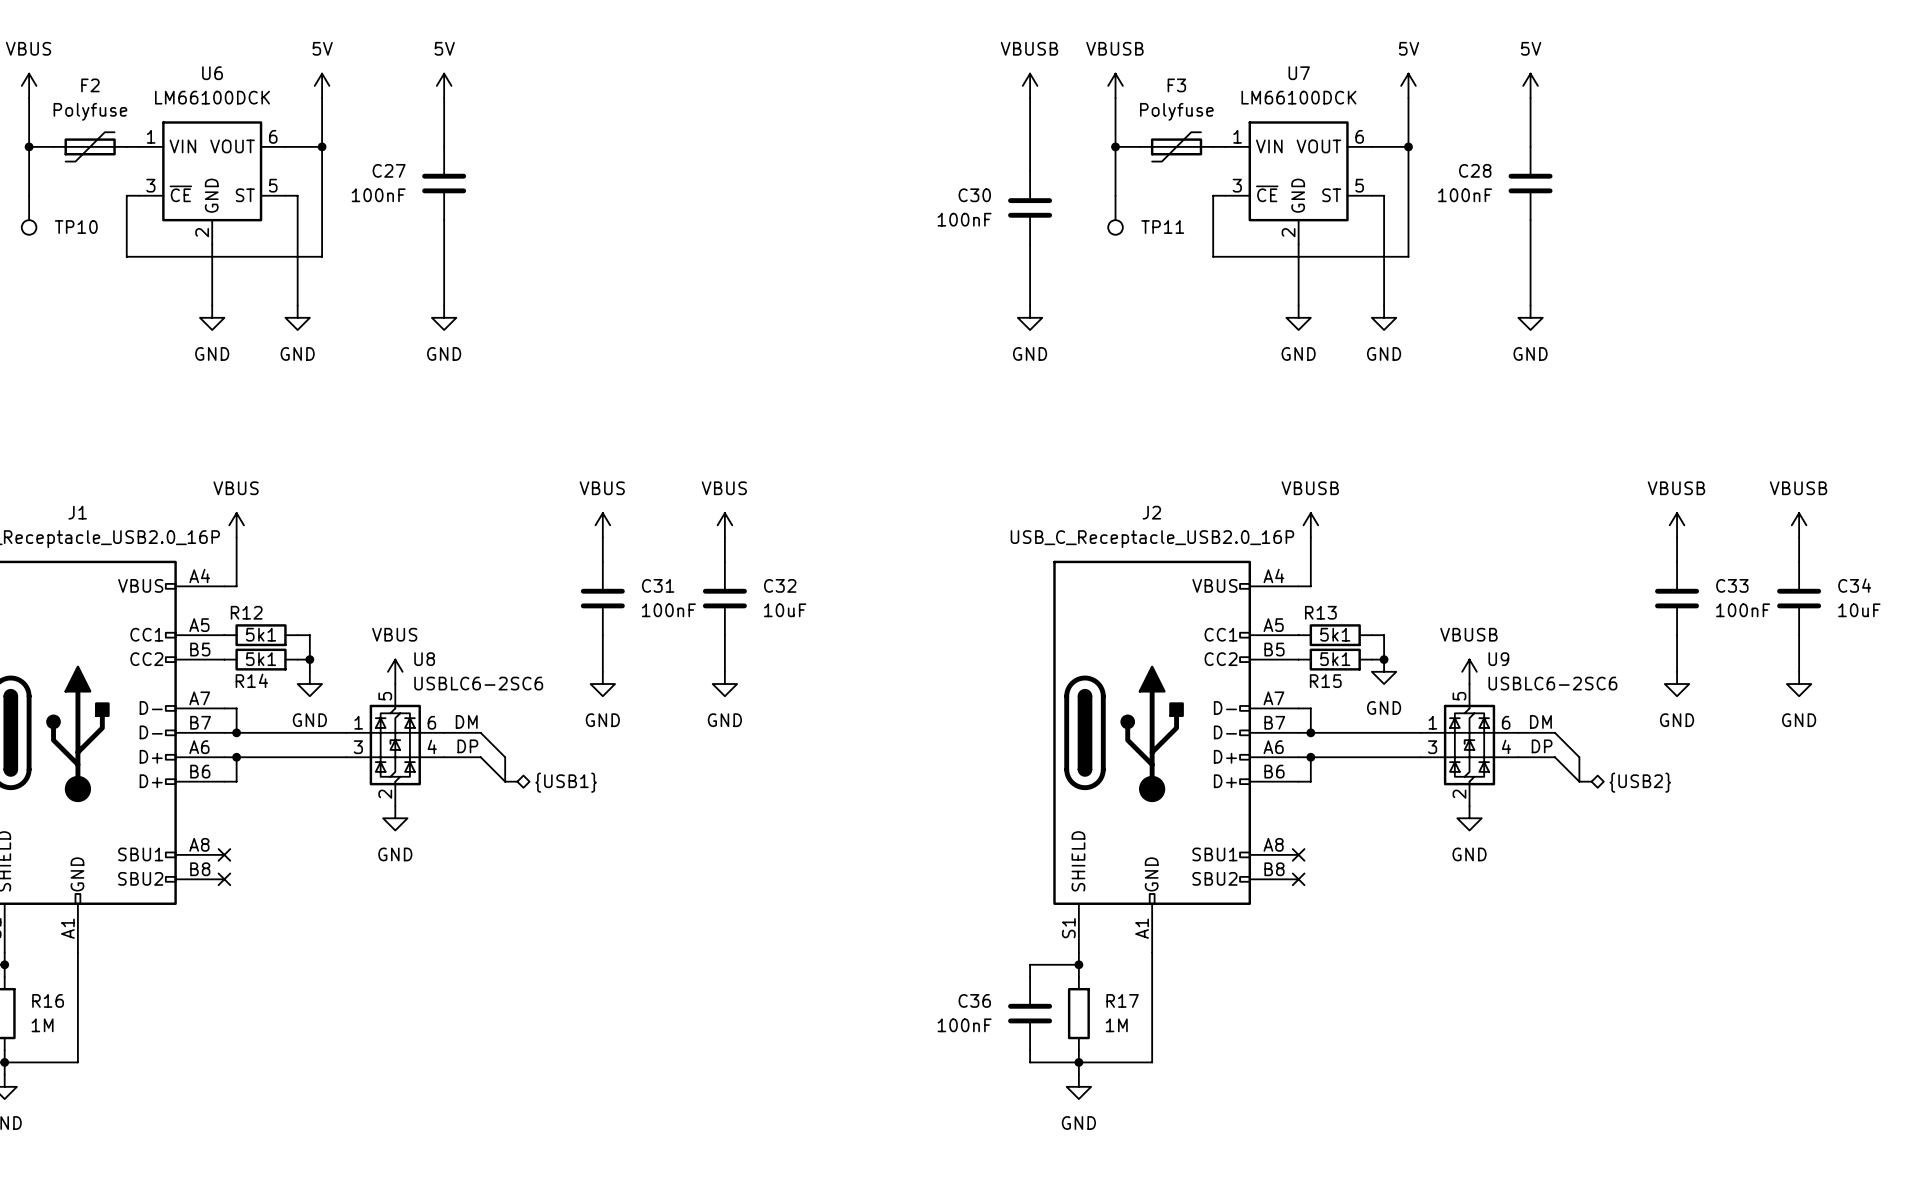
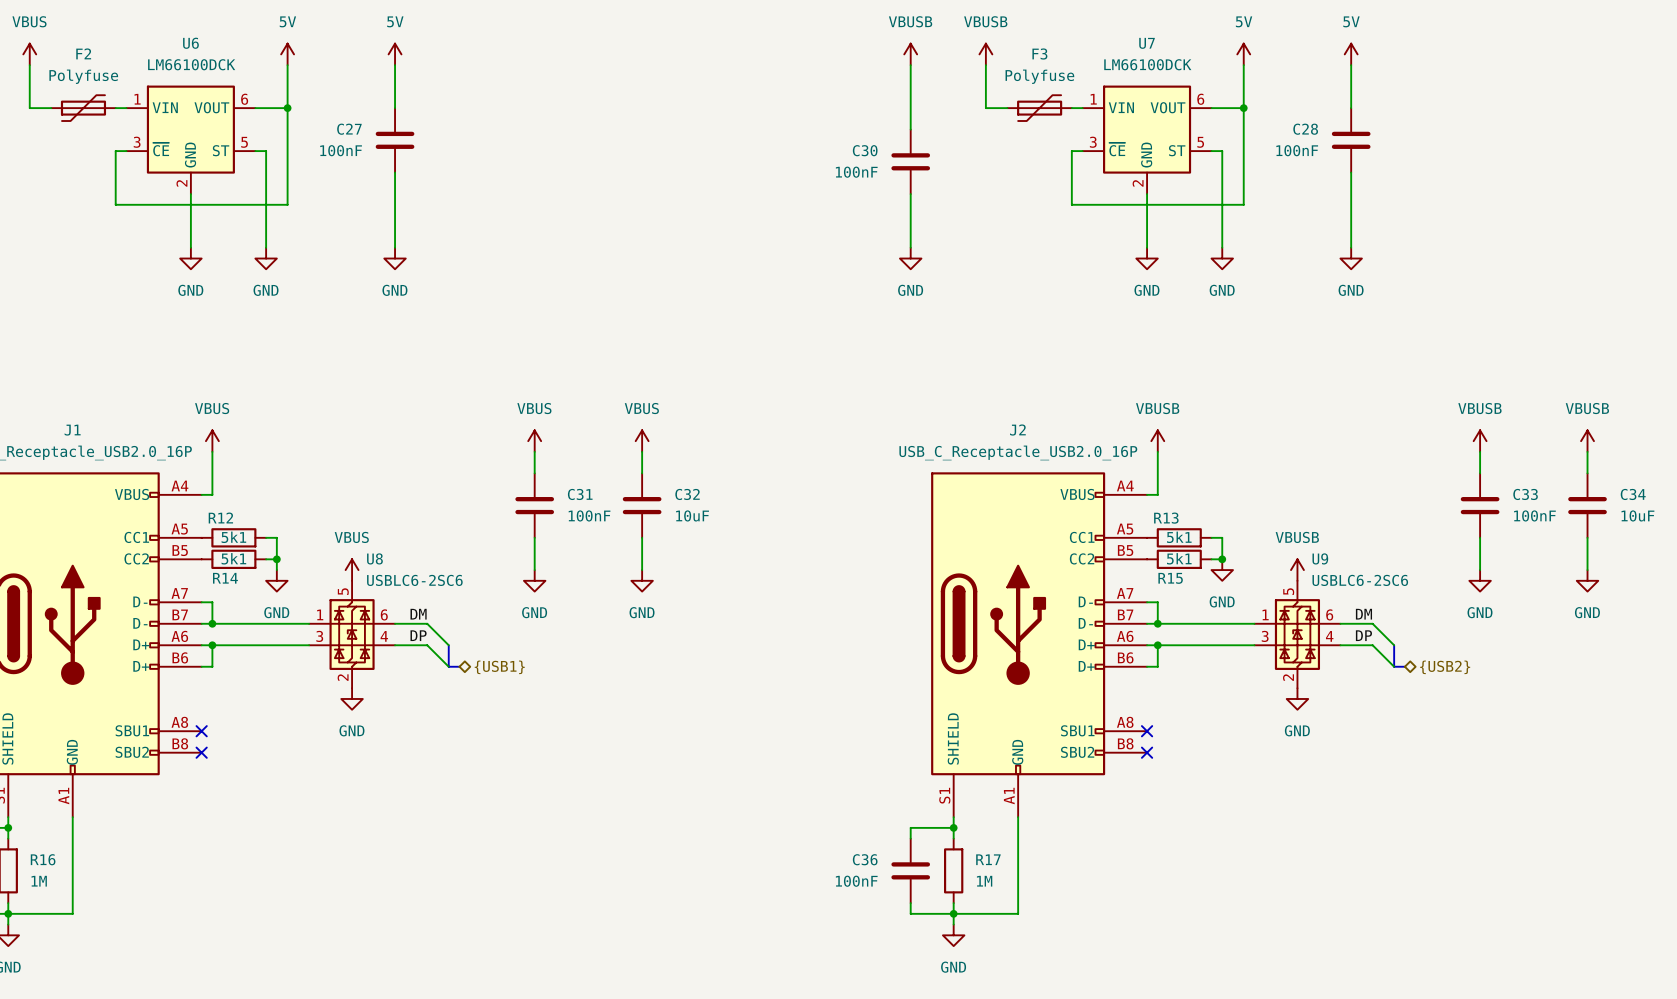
wire: (29, 146) (29, 195) -> none
junction: (29, 146) -> none
wire: (1115, 146) (1115, 195) -> none
junction: (1115, 146) -> none
TP10: (29, 215) -> none
TP11: (1115, 215) -> none

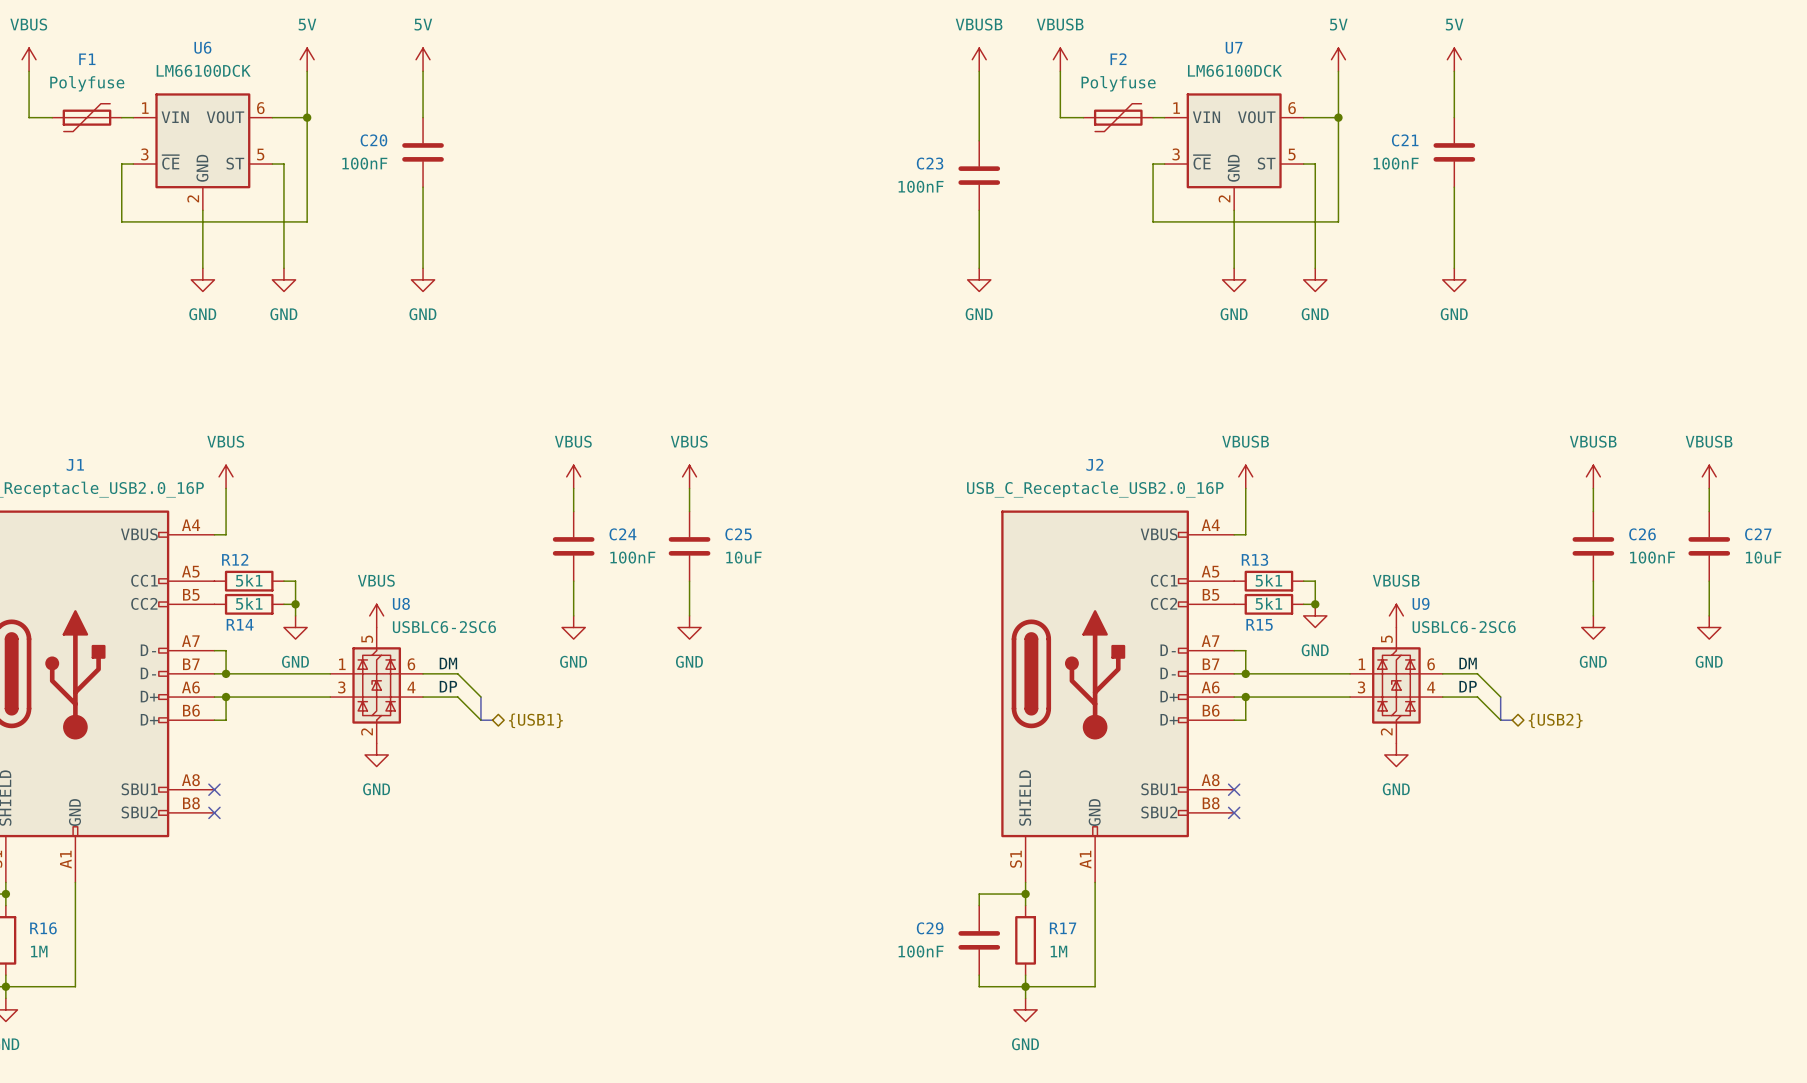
F2 name: F2 (83, 53) -> F1 (87, 59)
F3 name: F3 (1039, 54) -> F2 (1118, 59)
C27 name: C27 (349, 129) -> C20 (373, 140)
C28 name: C28 (1305, 129) -> C21 (1405, 140)
C30 name: C30 (865, 150) -> C23 (930, 163)
C31 name: C31 (580, 494) -> C24 (622, 534)
C32 name: C32 (687, 494) -> C25 (738, 534)
C33 name: C33 (1525, 494) -> C26 (1642, 534)
C34 name: C34 (1633, 494) -> C27 (1758, 534)
C36 name: C36 (865, 859) -> C29 (930, 928)

